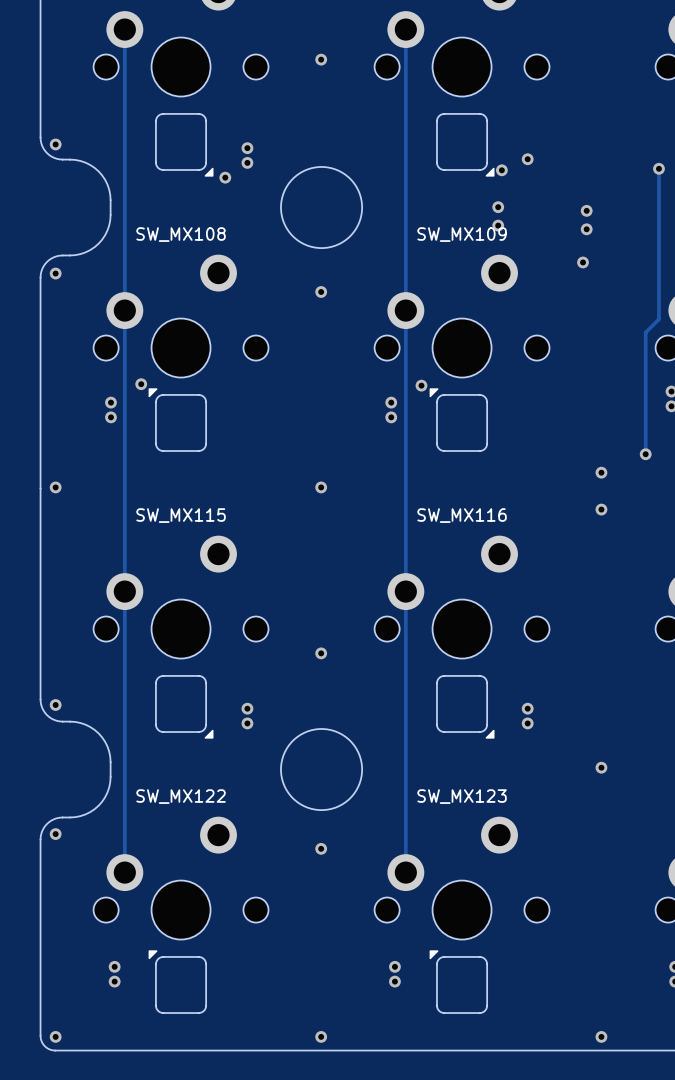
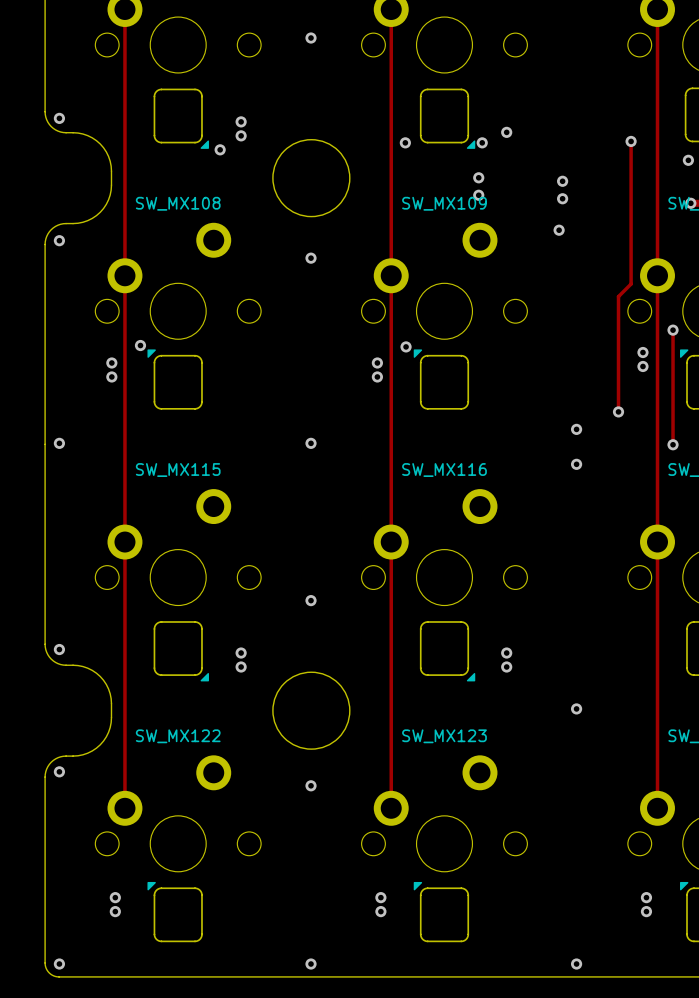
via: none -> (405, 142)

